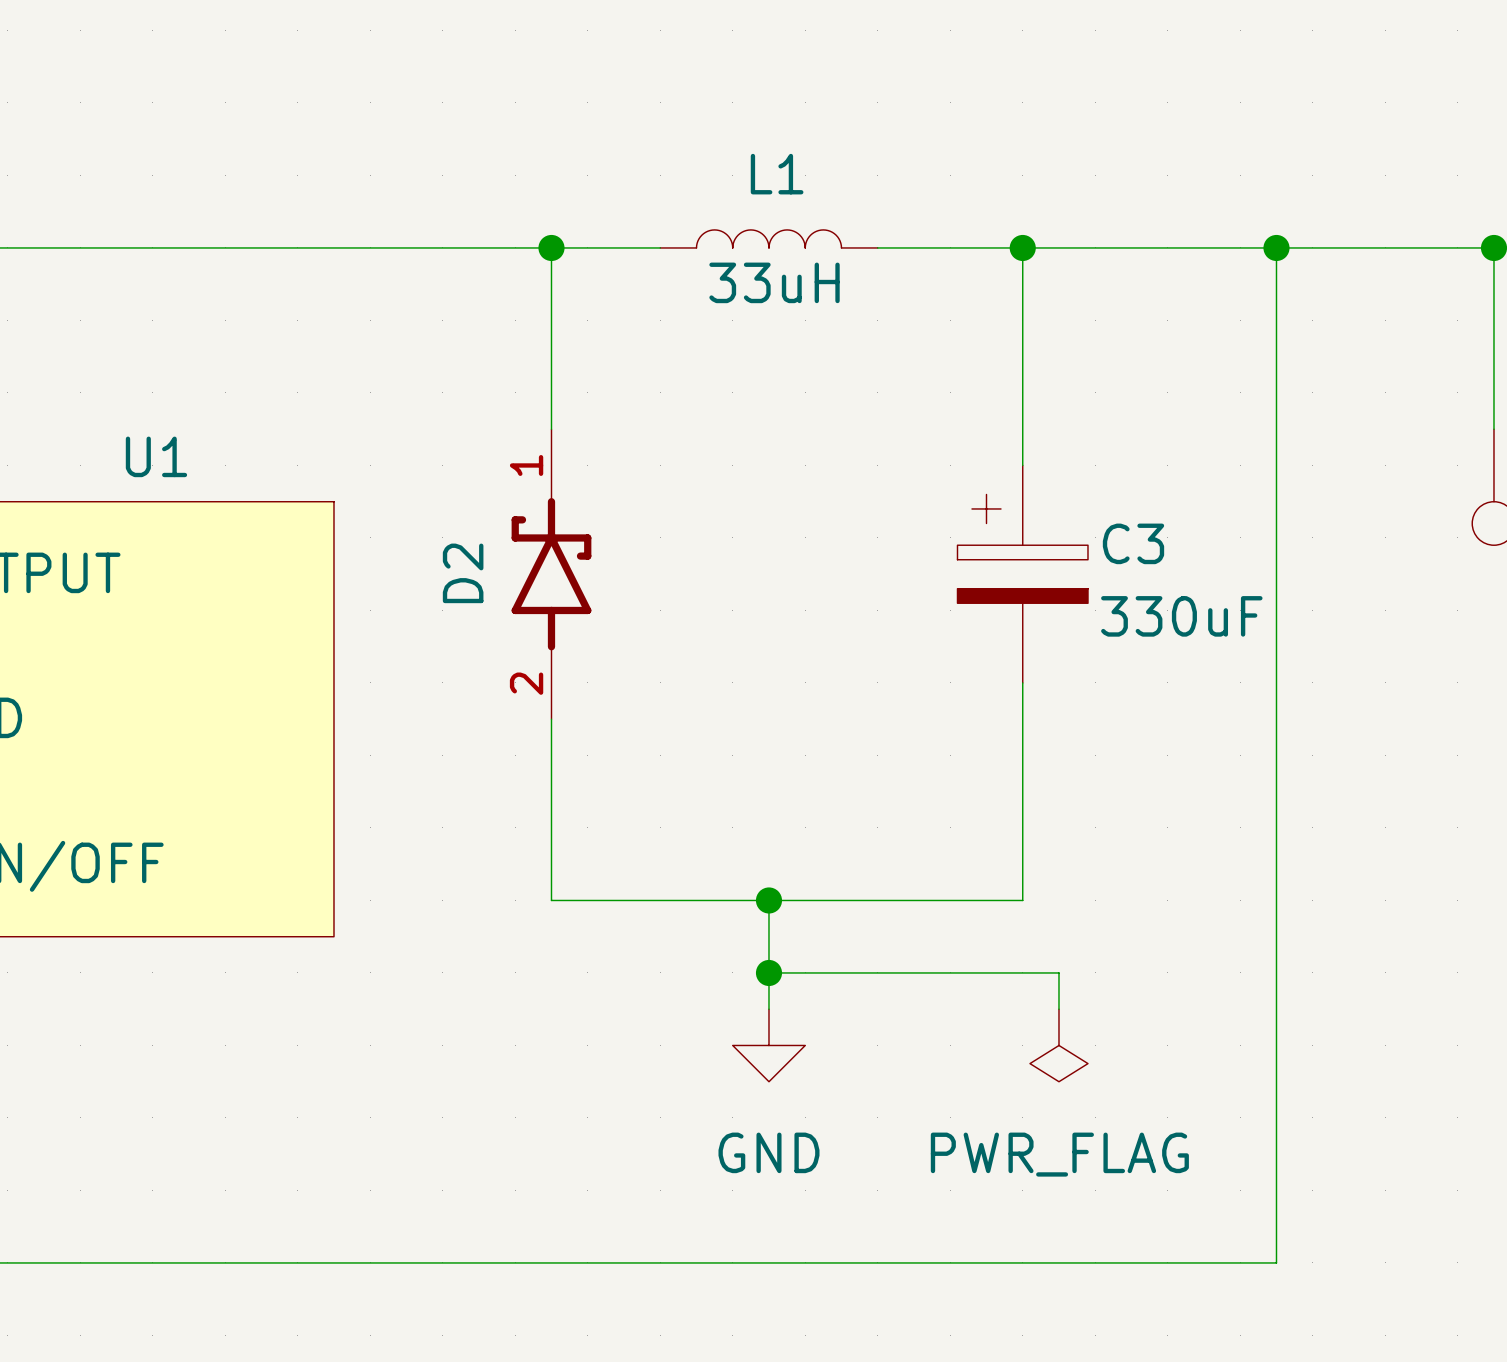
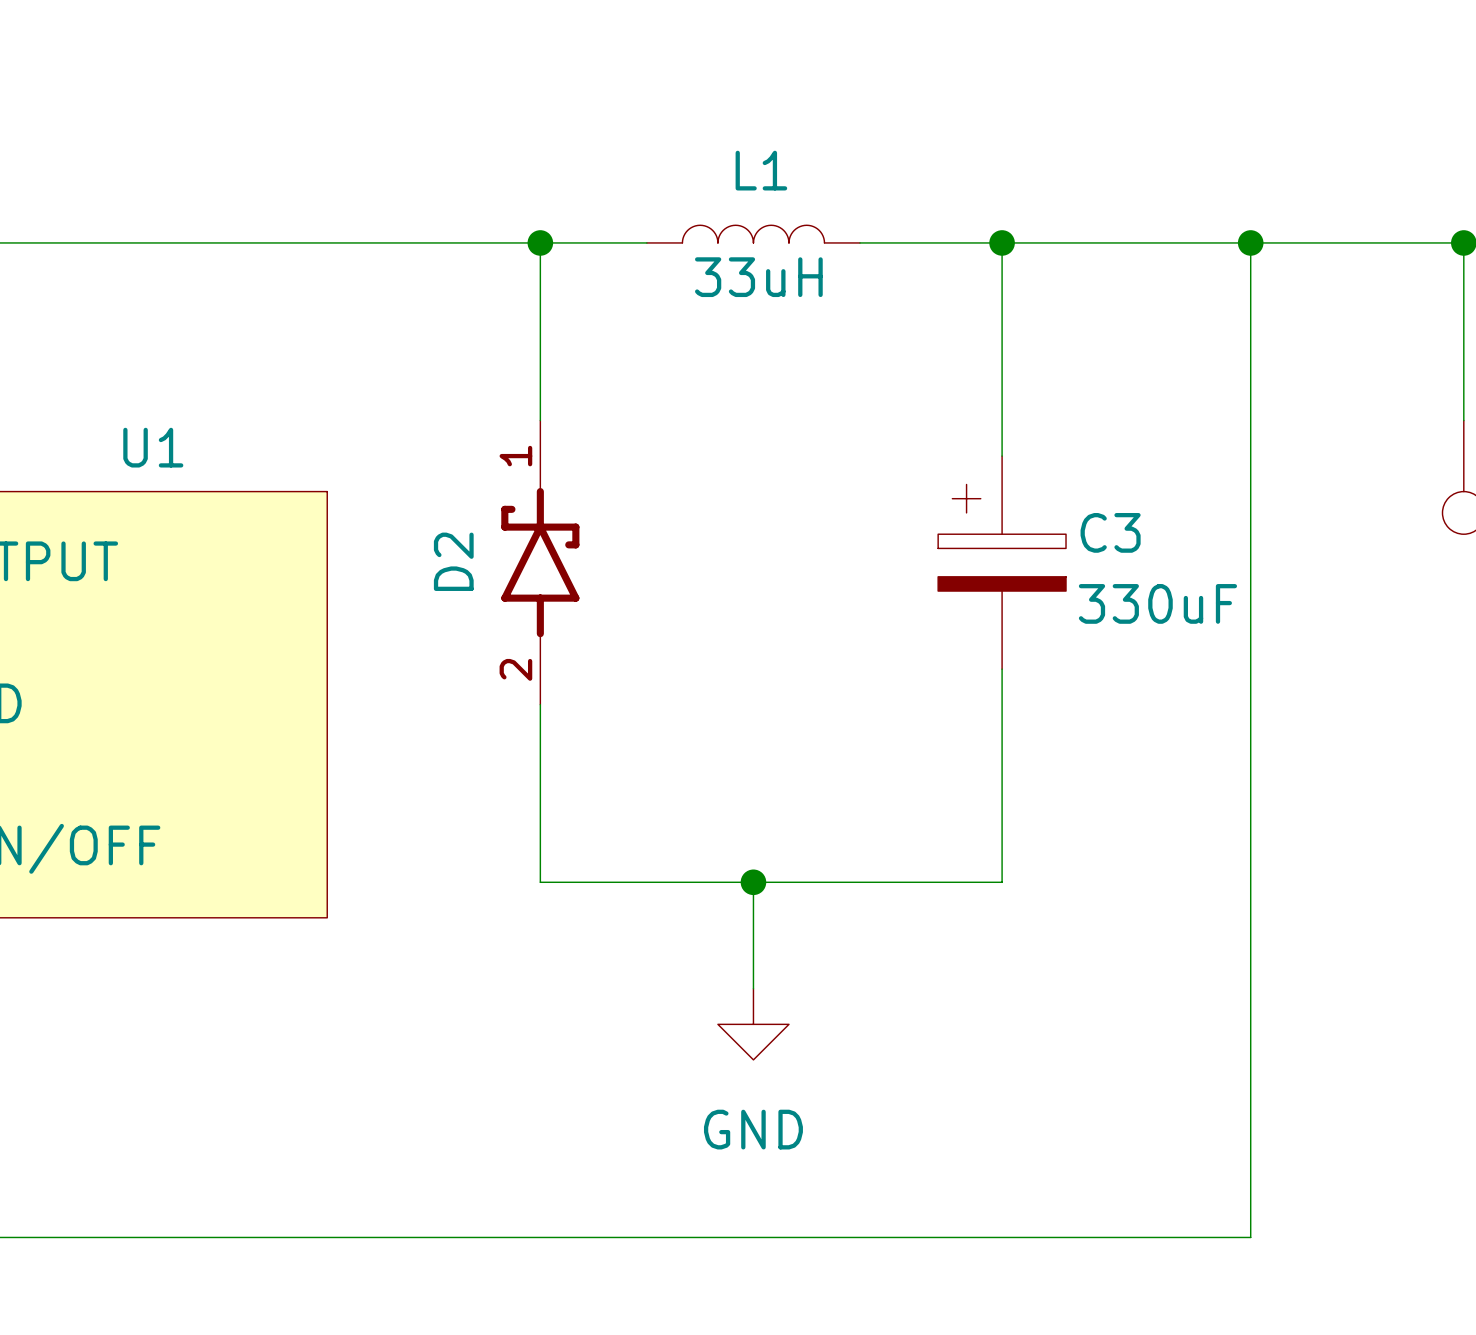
wire: (768, 972) (1058, 972) (1058, 1009) -> none
junction: (768, 972) -> none
power symbol: PWR_FLAG (1058, 1045) -> none

